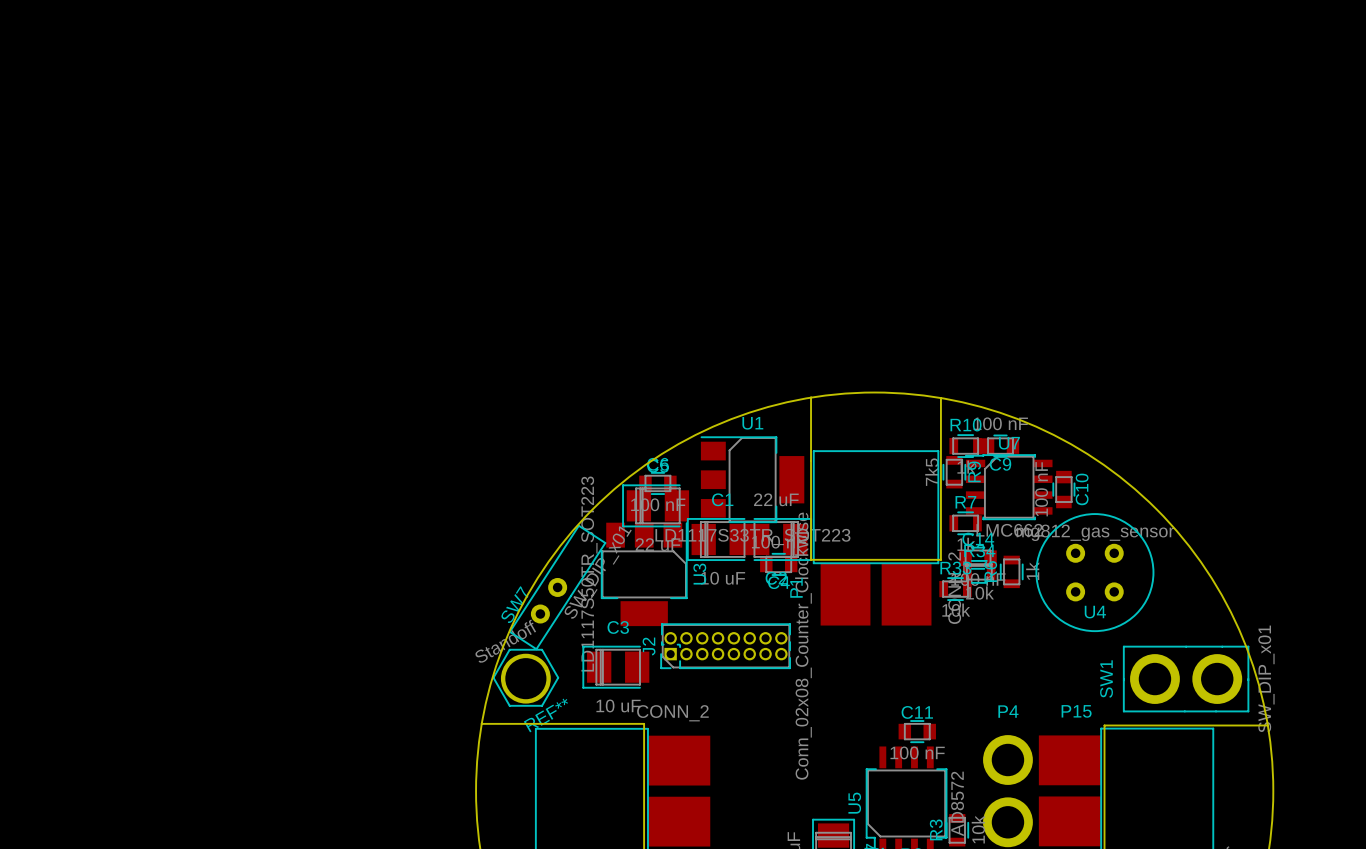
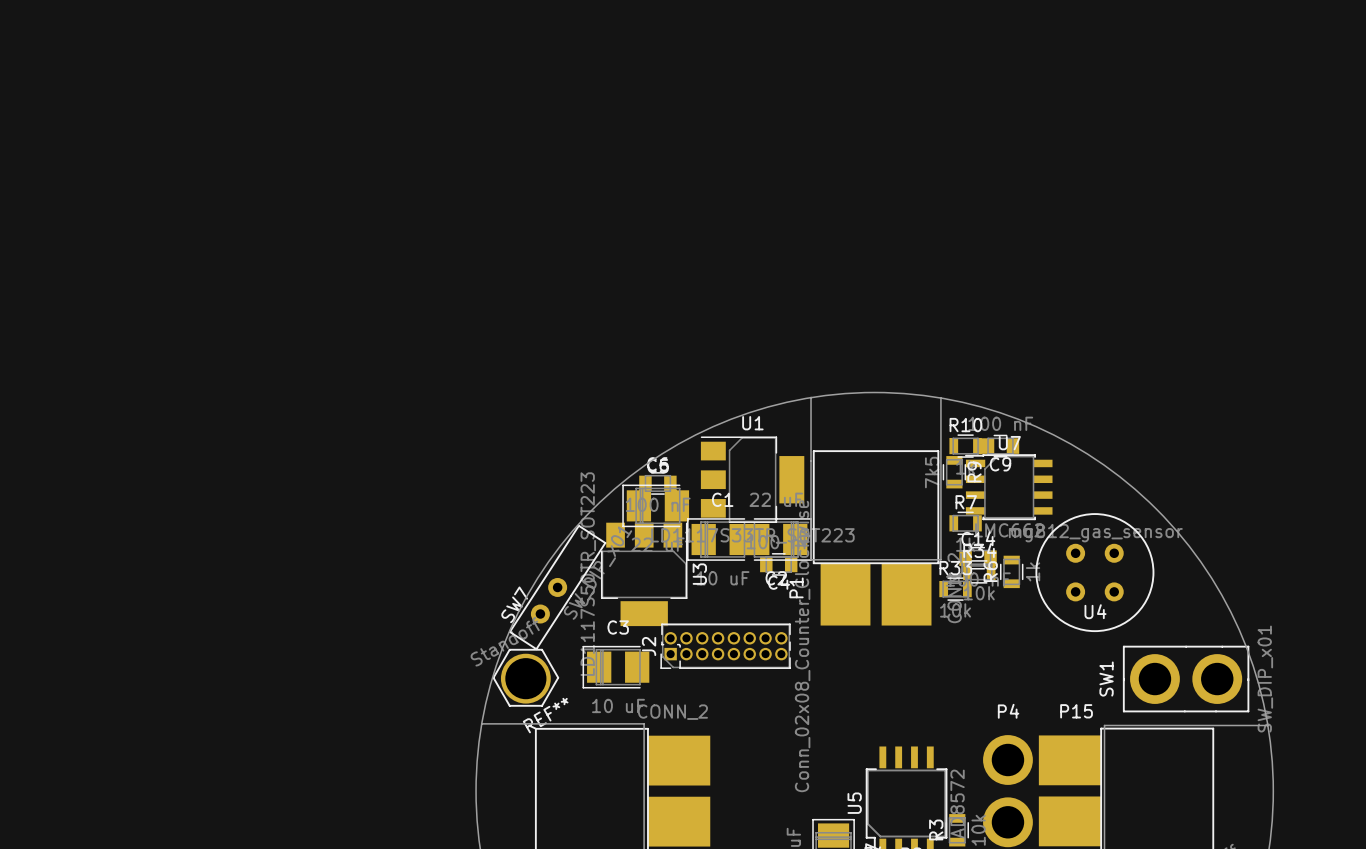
C10: 100 nF (1063, 489) -> none
C11: 100 nF (917, 731) -> none

